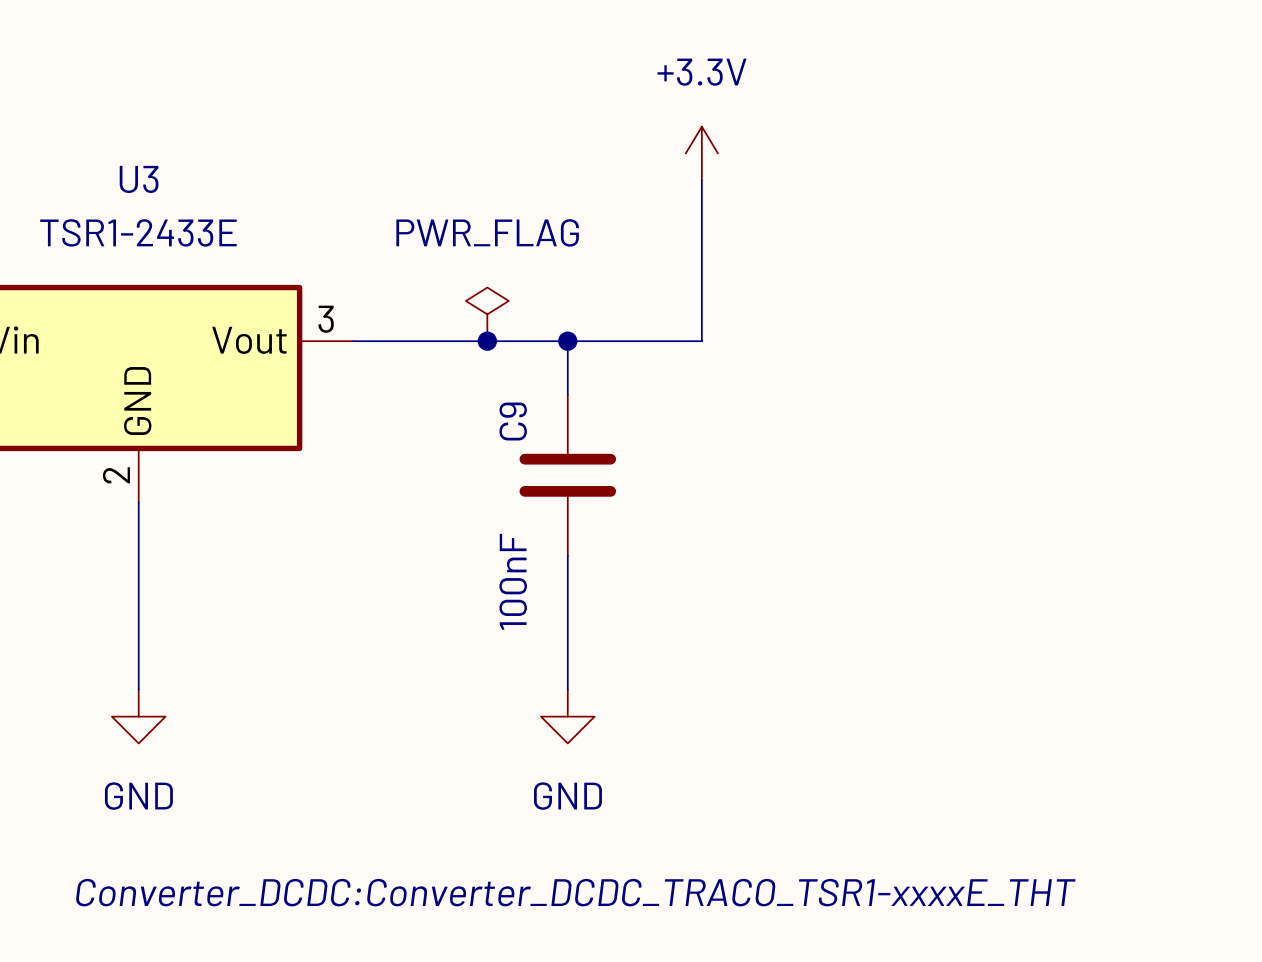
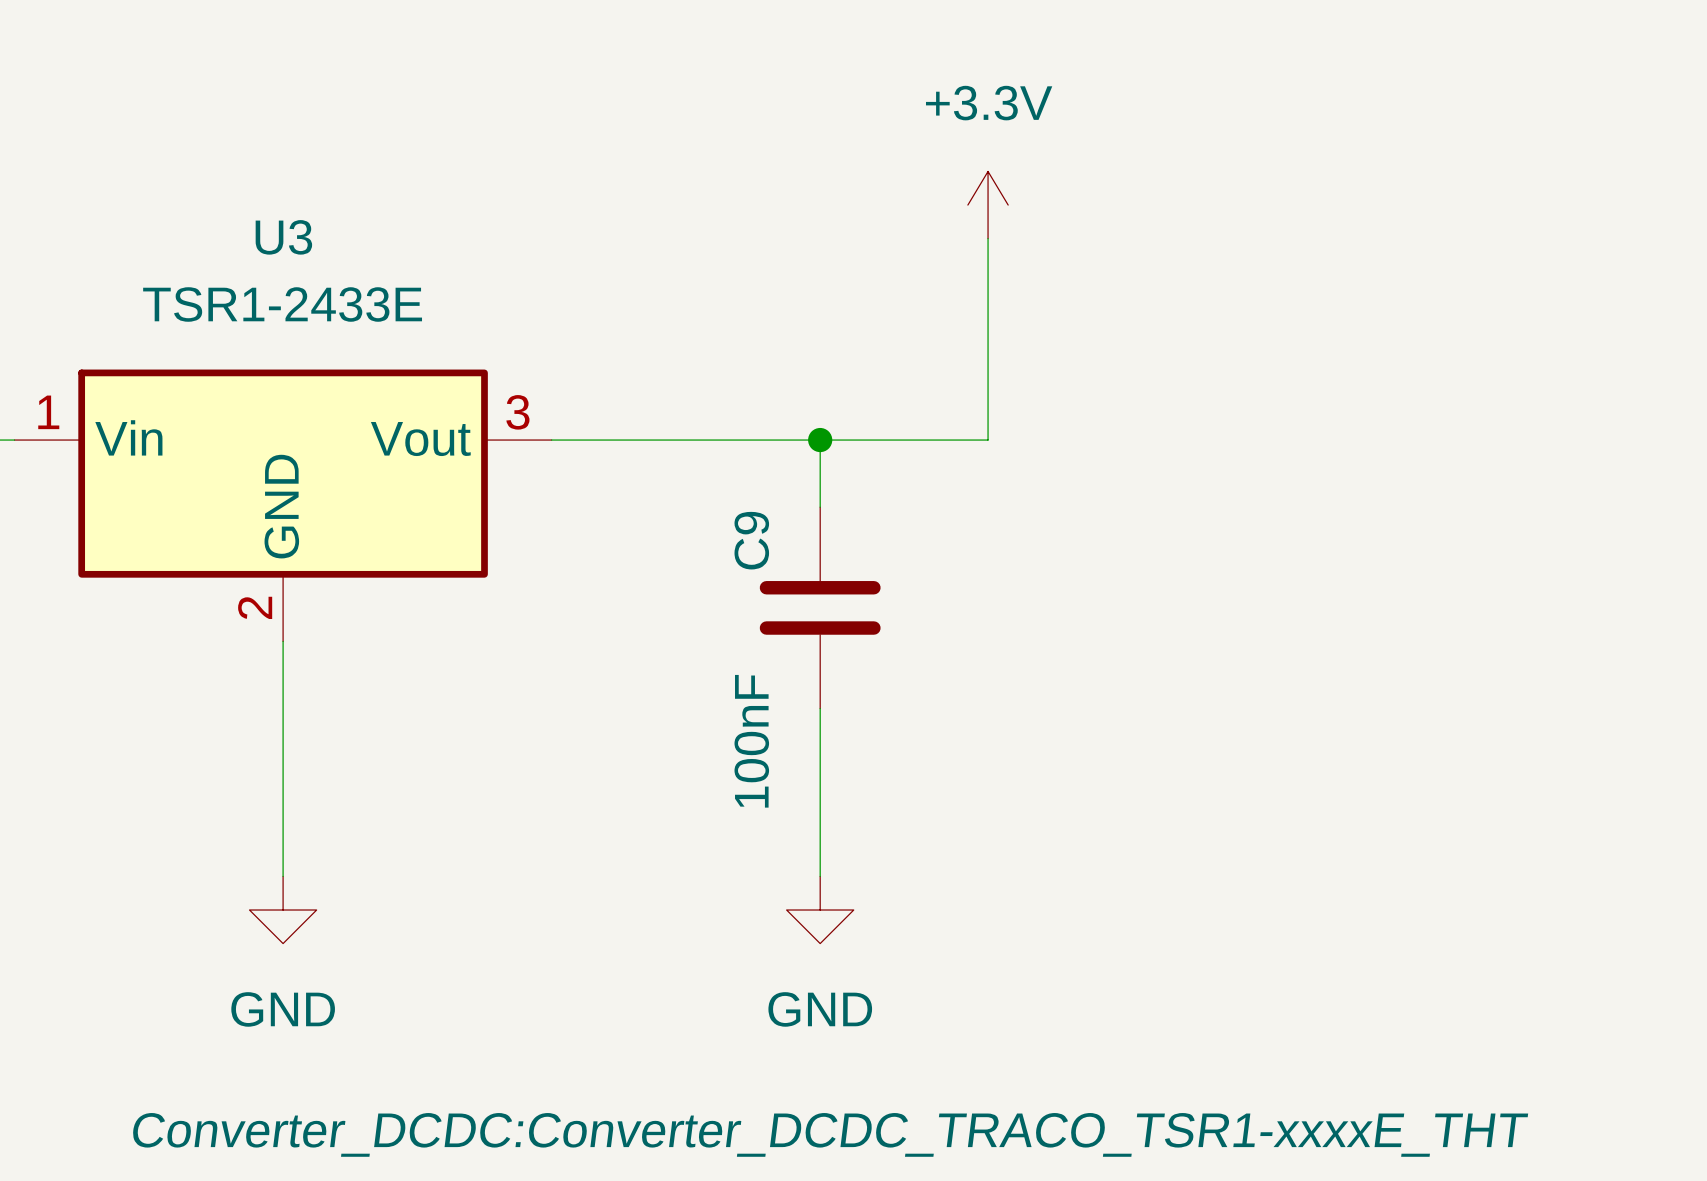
power symbol: PWR_FLAG (487, 314) -> none
junction: (487, 341) -> none

